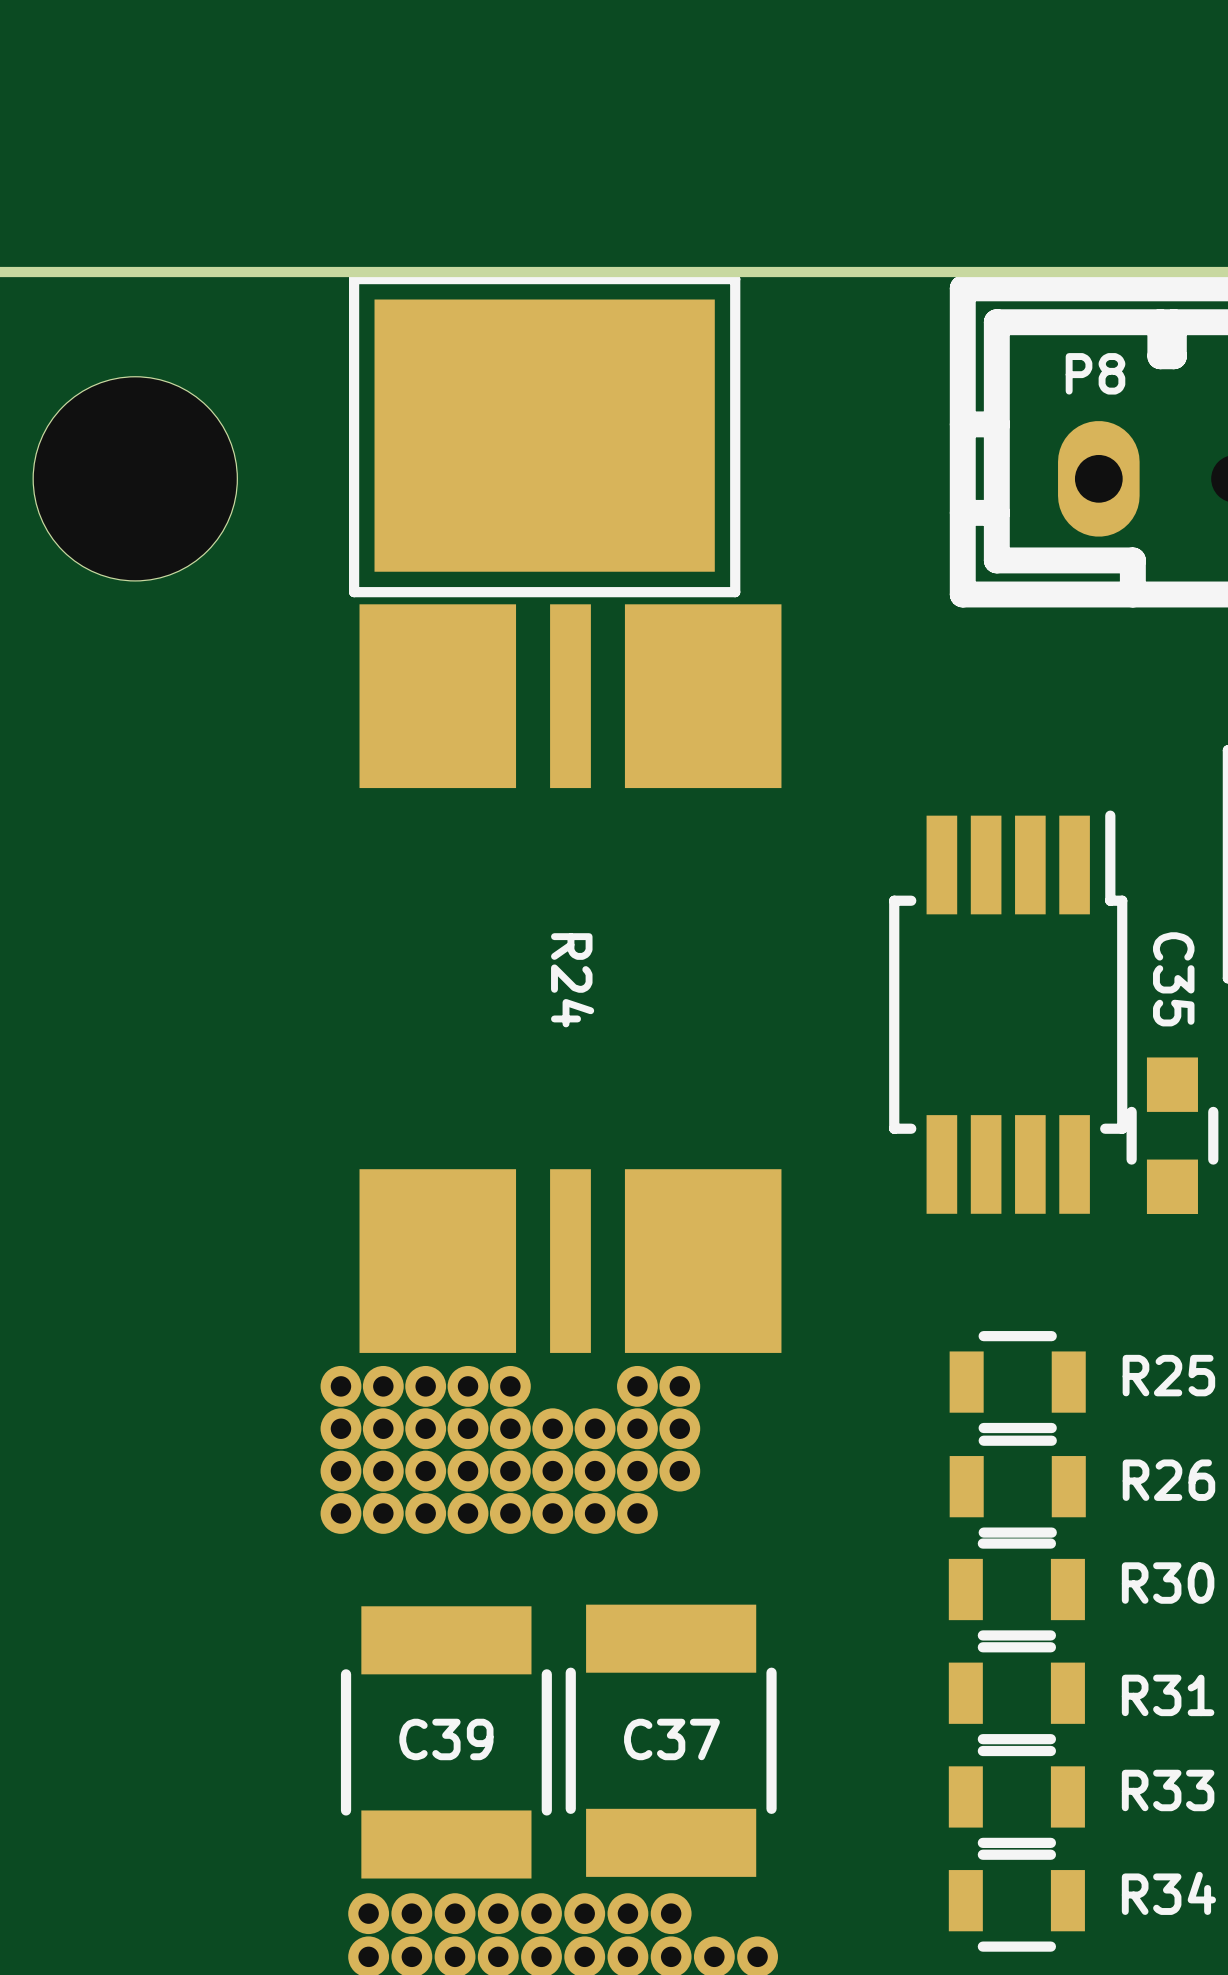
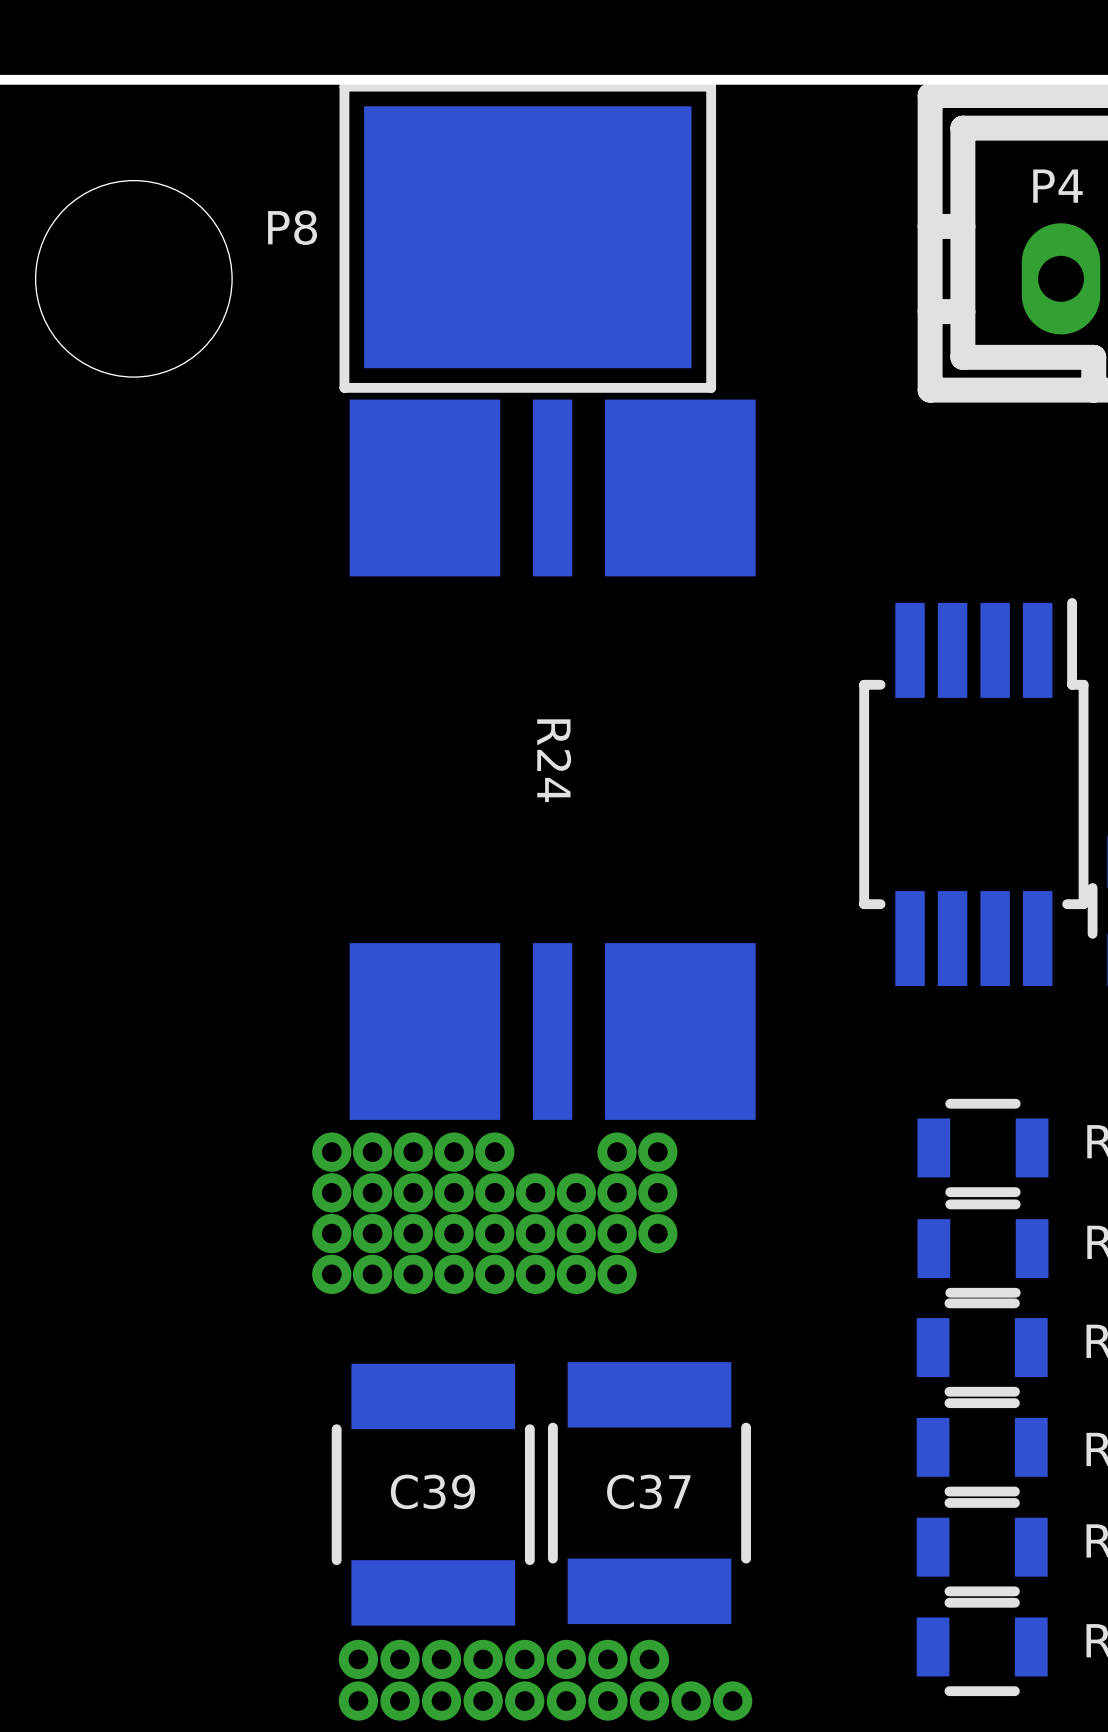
P8 name position: P8 (1095, 373) -> P8 (292, 227)
P4 name: none -> P4 (1057, 186)

